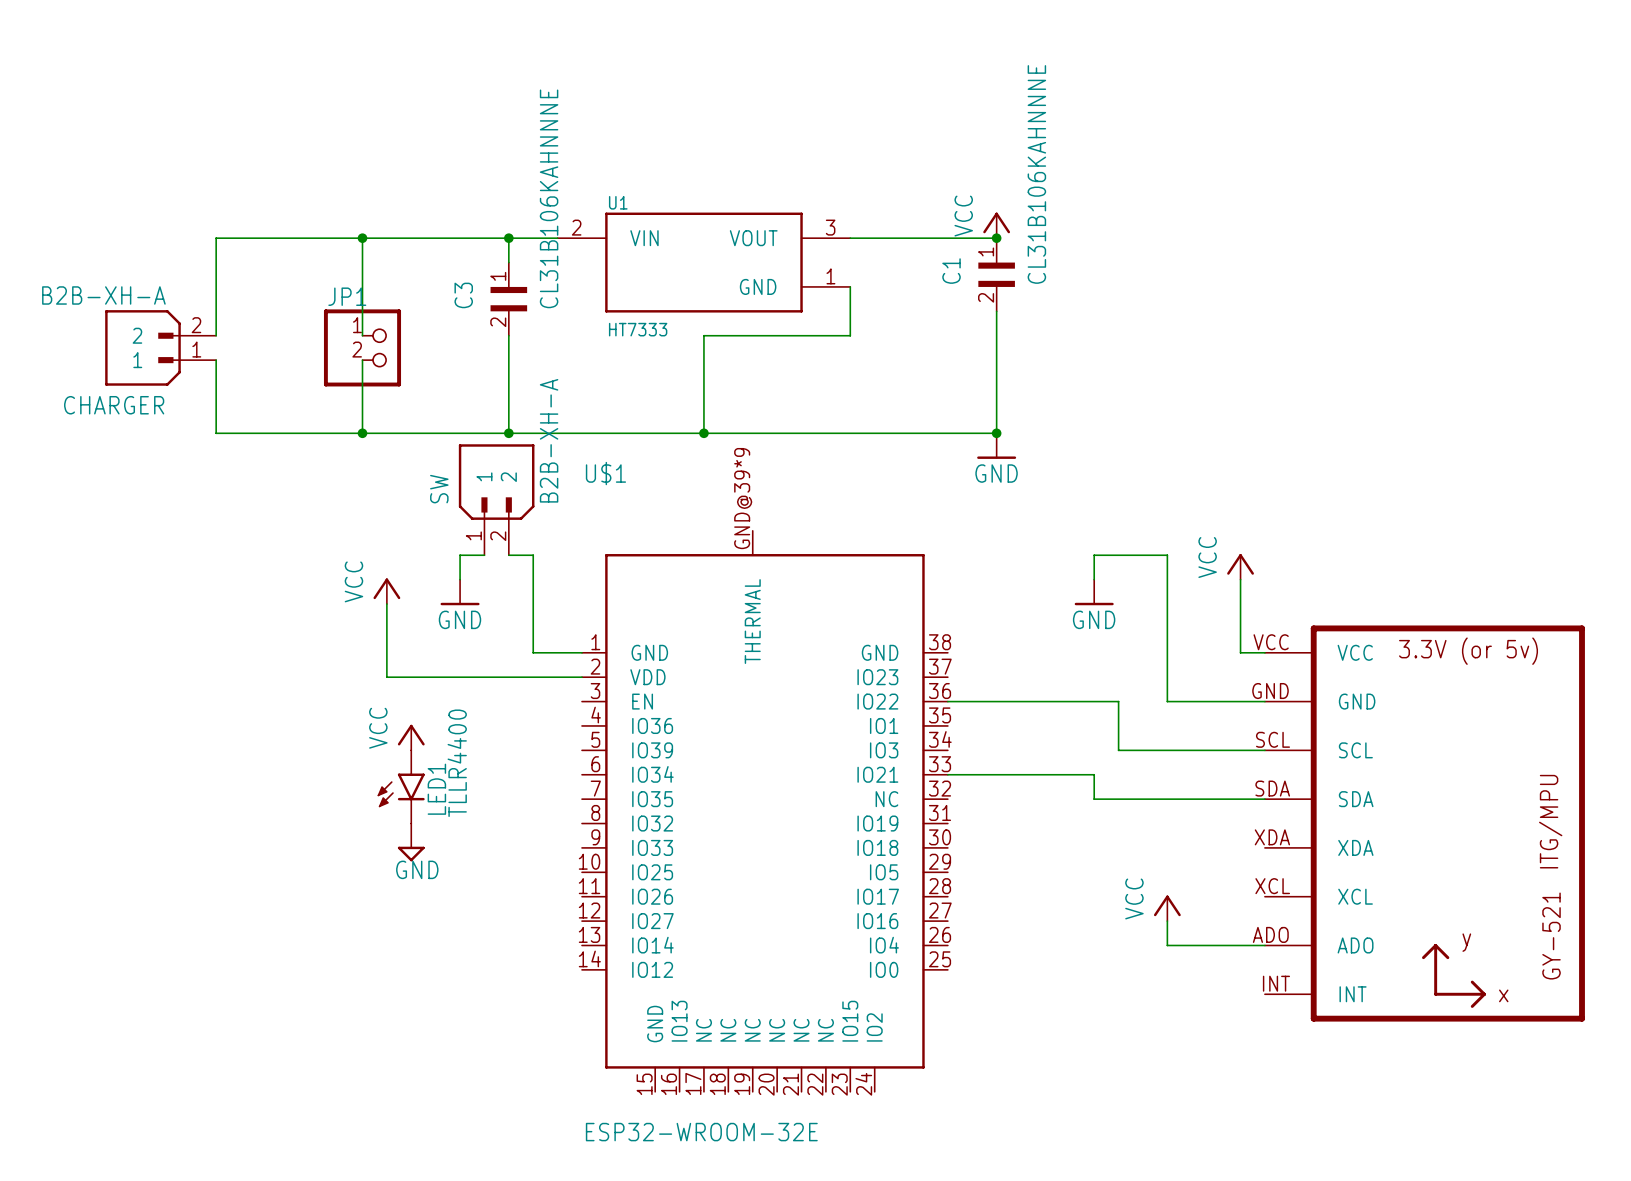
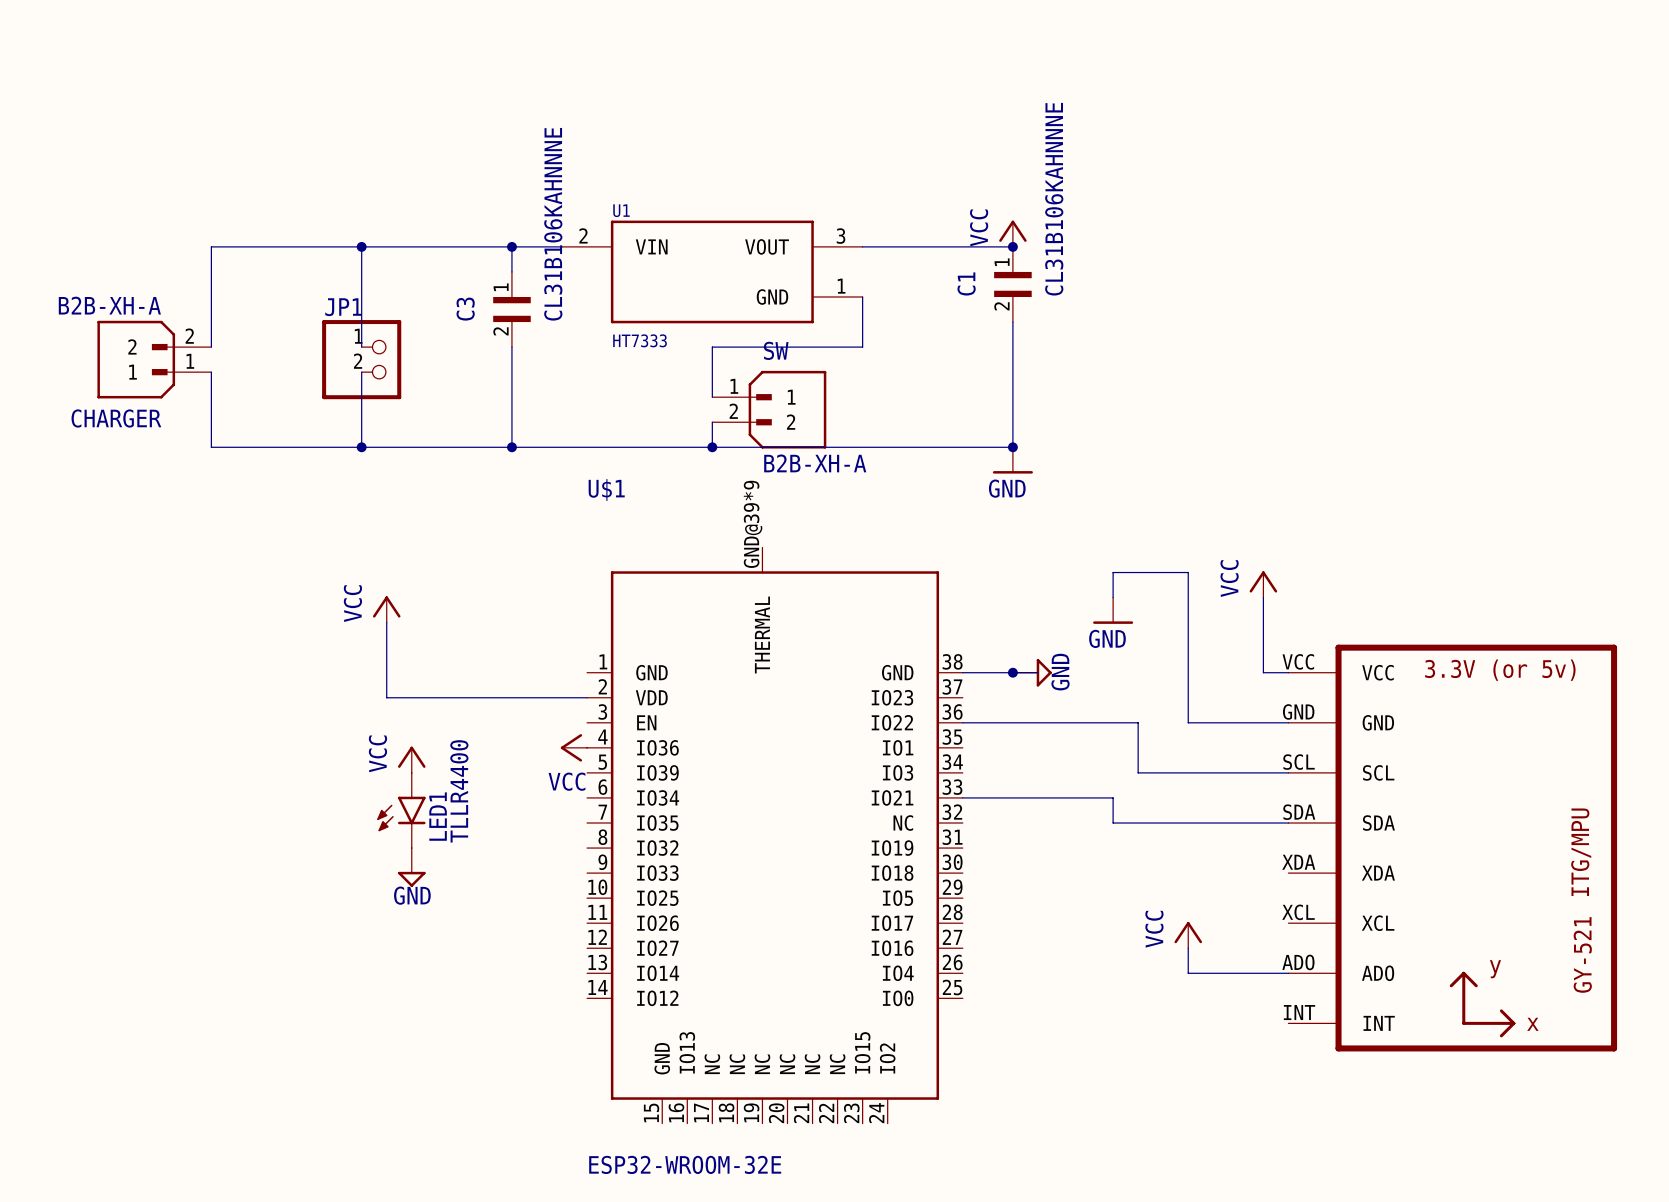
wire: (703, 384) (703, 408) -> none
SW: none -> B2B-XH-A (769, 409)
SW: B2B-XH-A (496, 499) -> none
wire: (484, 555) (460, 555) (460, 579) -> none
wire: (508, 555) (533, 555) (533, 652) (582, 652) -> none
power symbol: GND (460, 592) -> none
wire: none -> (962, 672) (1037, 672)
junction: none -> (1012, 672)
power symbol: none -> GND (1032, 672)
power symbol: none -> VCC (573, 747)

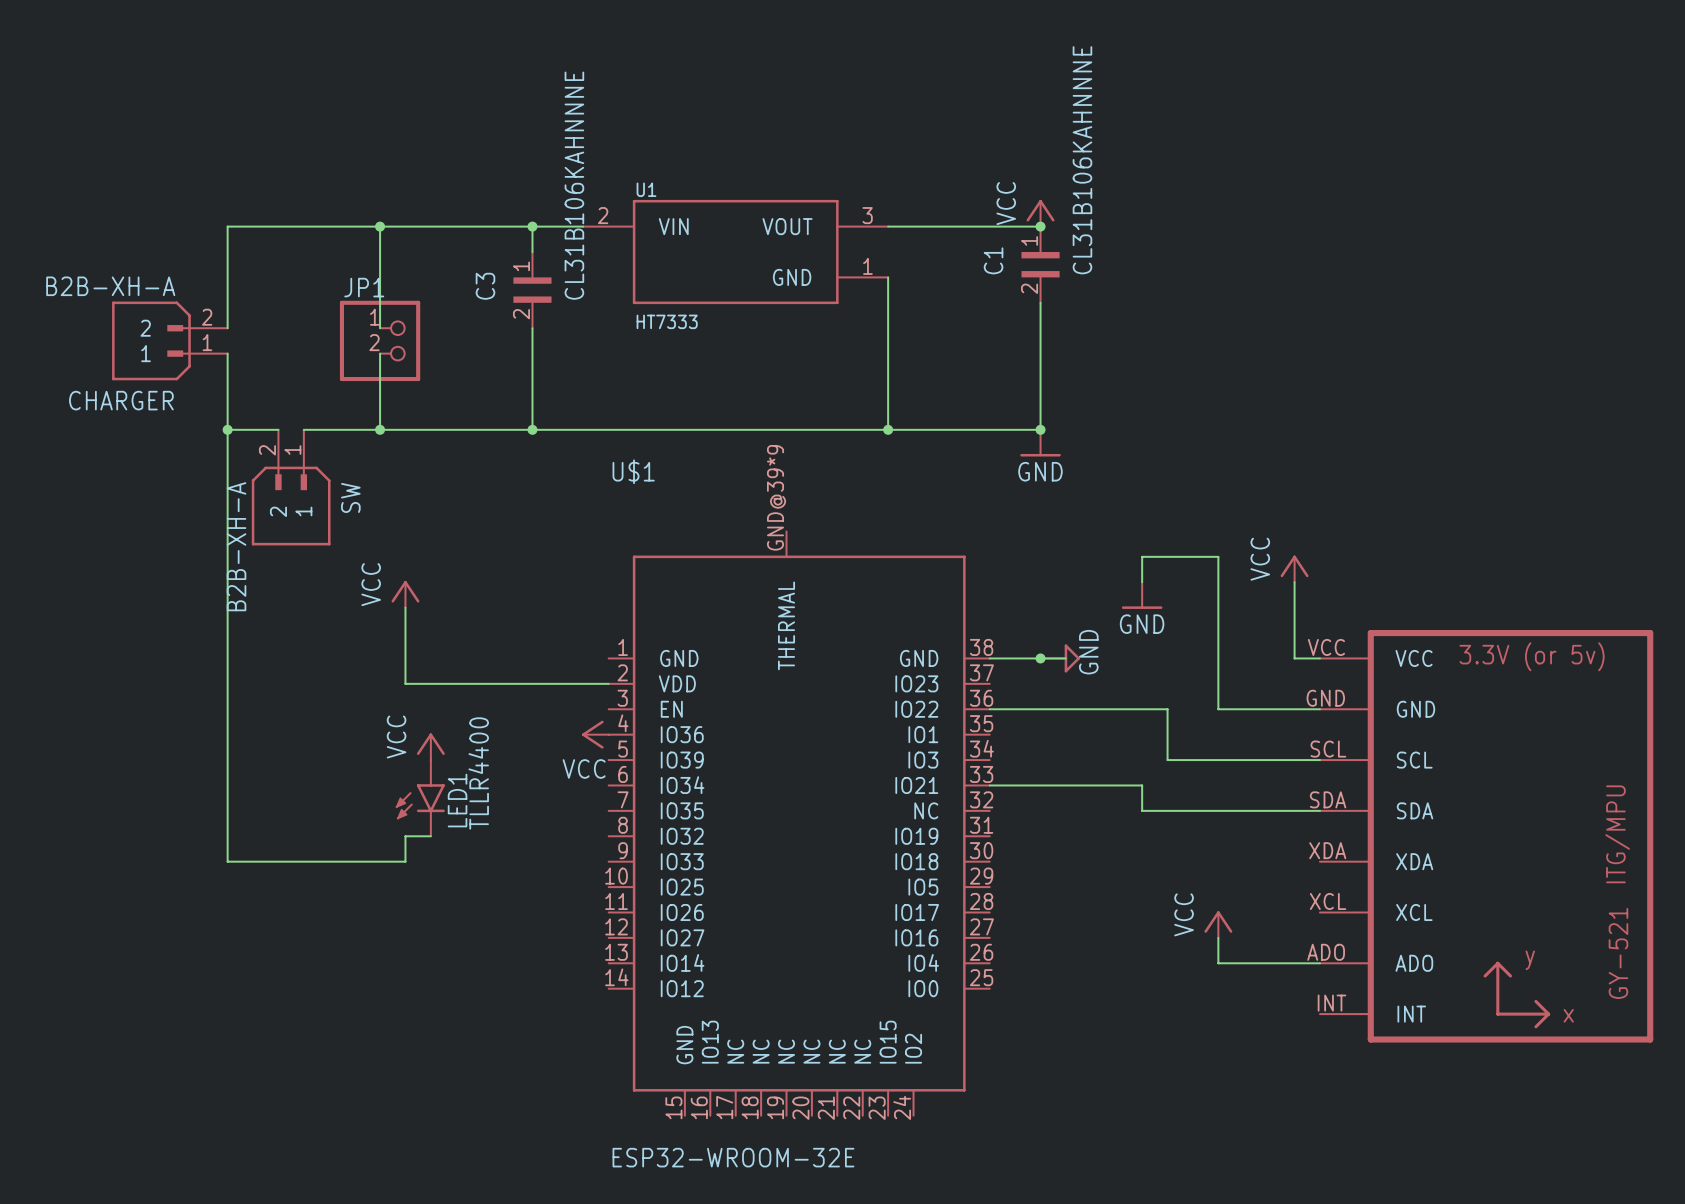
wire: (862, 347) (712, 347) (712, 397) -> (888, 328) (888, 429)
SW: B2B-XH-A (769, 409) -> none
wire: (712, 422) (712, 447) -> none
wire: none -> (227, 429) (227, 861) (405, 861) (405, 836) (430, 836)
junction: none -> (227, 429)
wire: (261, 447) (286, 447) -> none
junction: (712, 447) -> none
junction: none -> (888, 429)
SW: none -> B2B-XH-A (291, 487)
power symbol: GND (411, 867) -> none

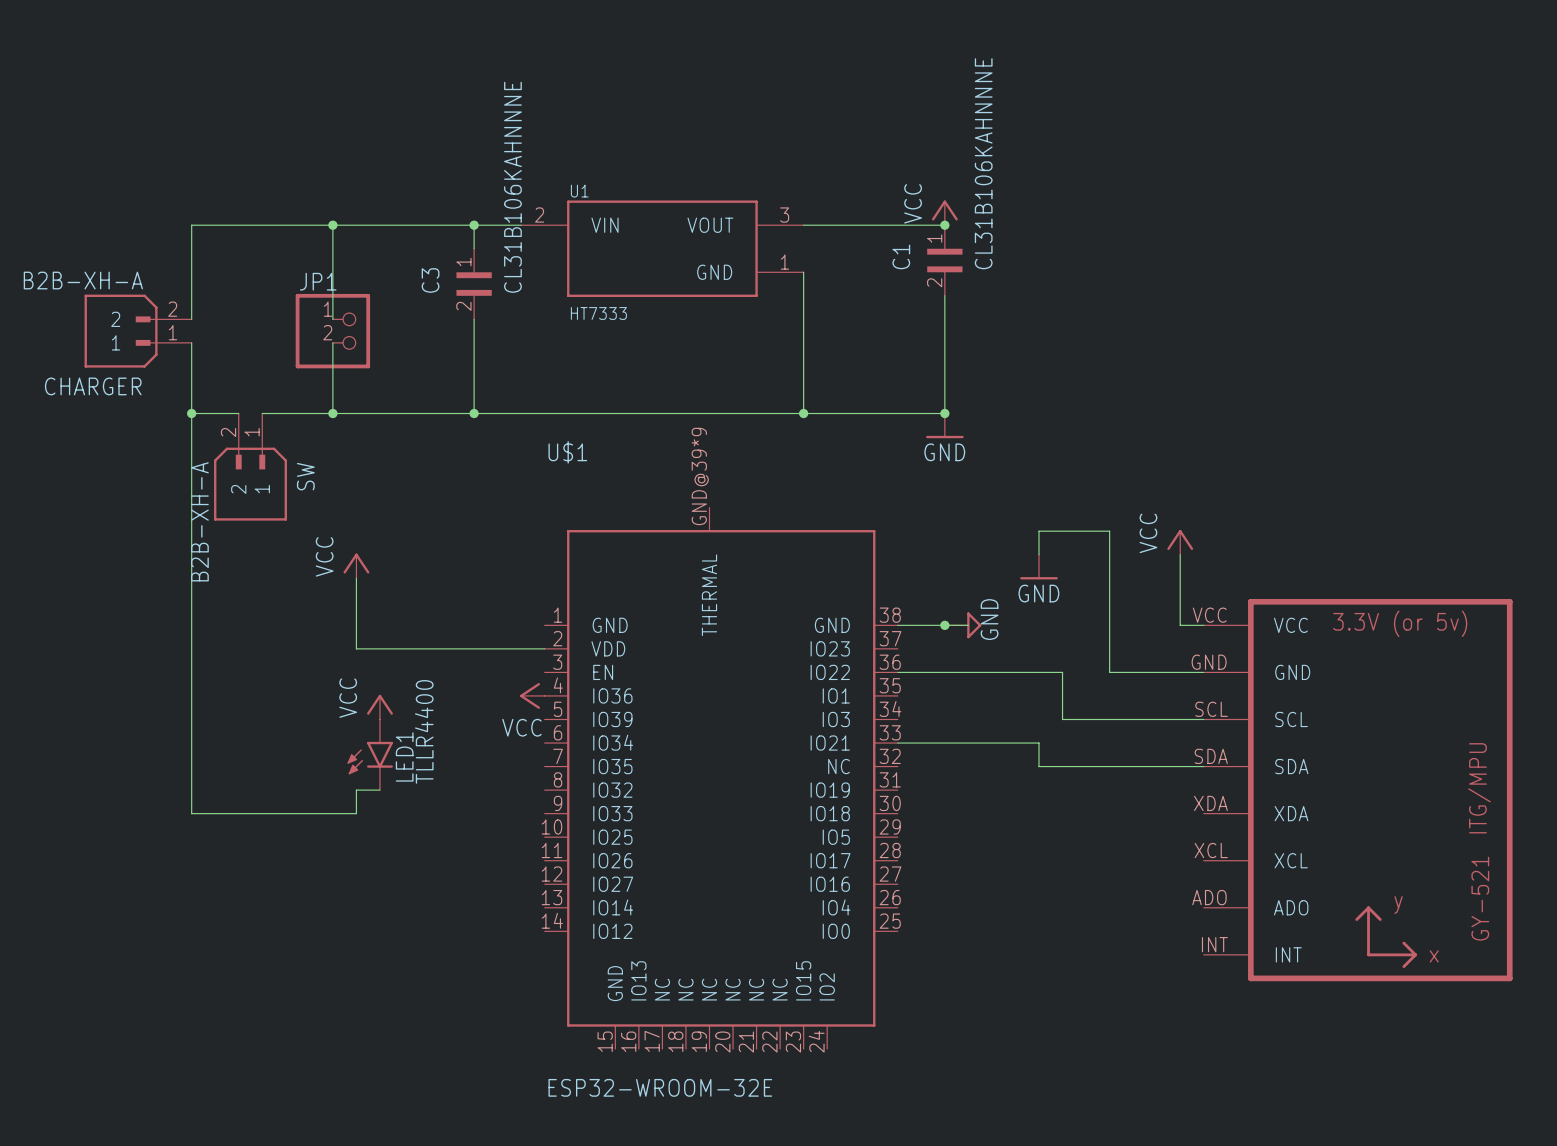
power symbol: VCC (1218, 924) -> none
wire: (1218, 937) (1218, 963) (1319, 963) -> none

